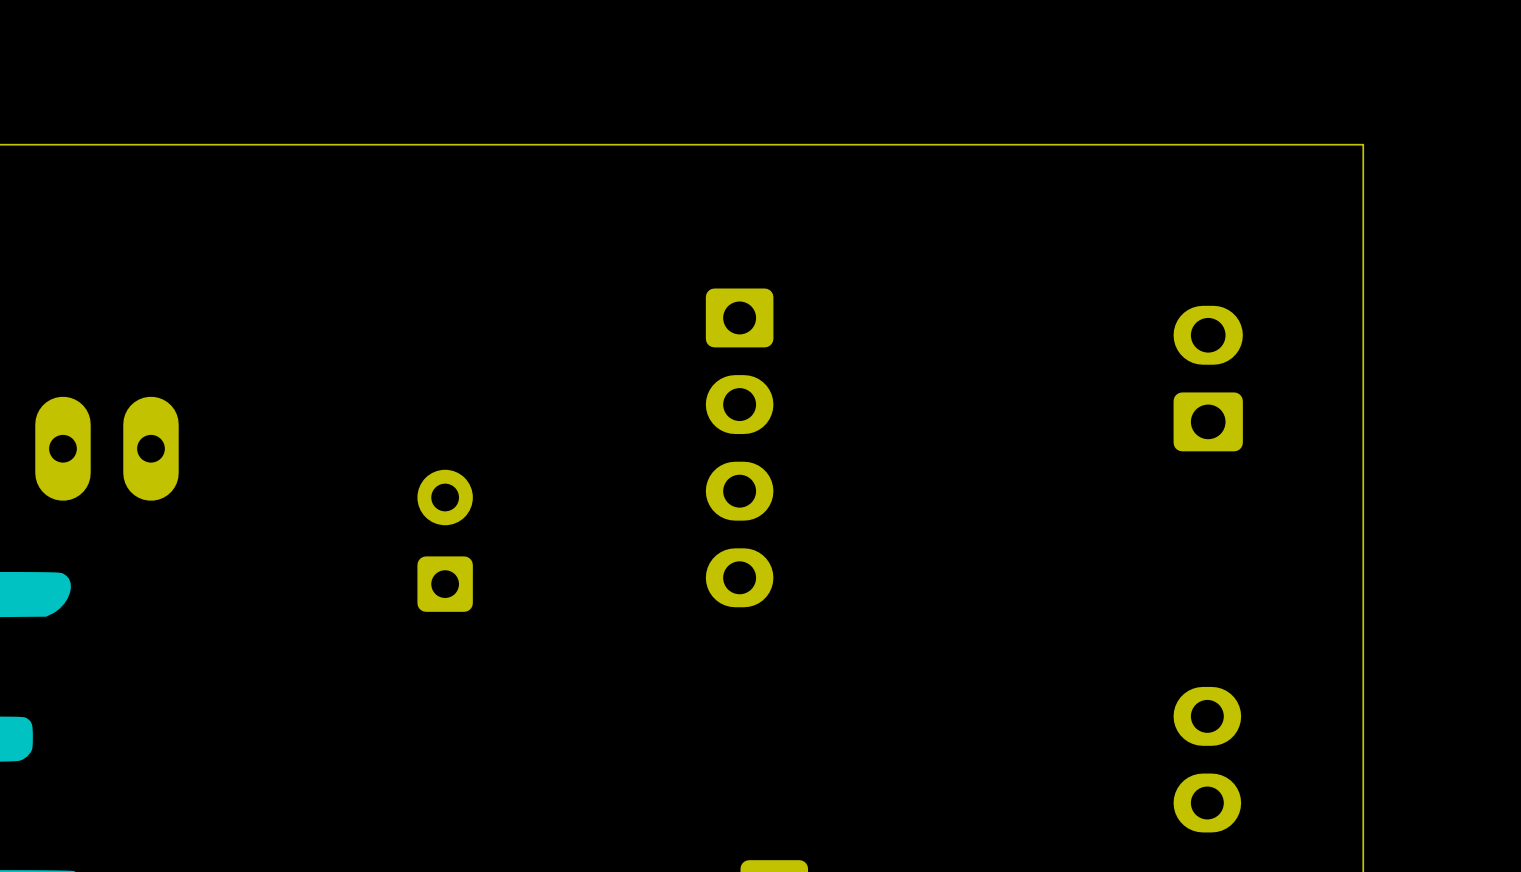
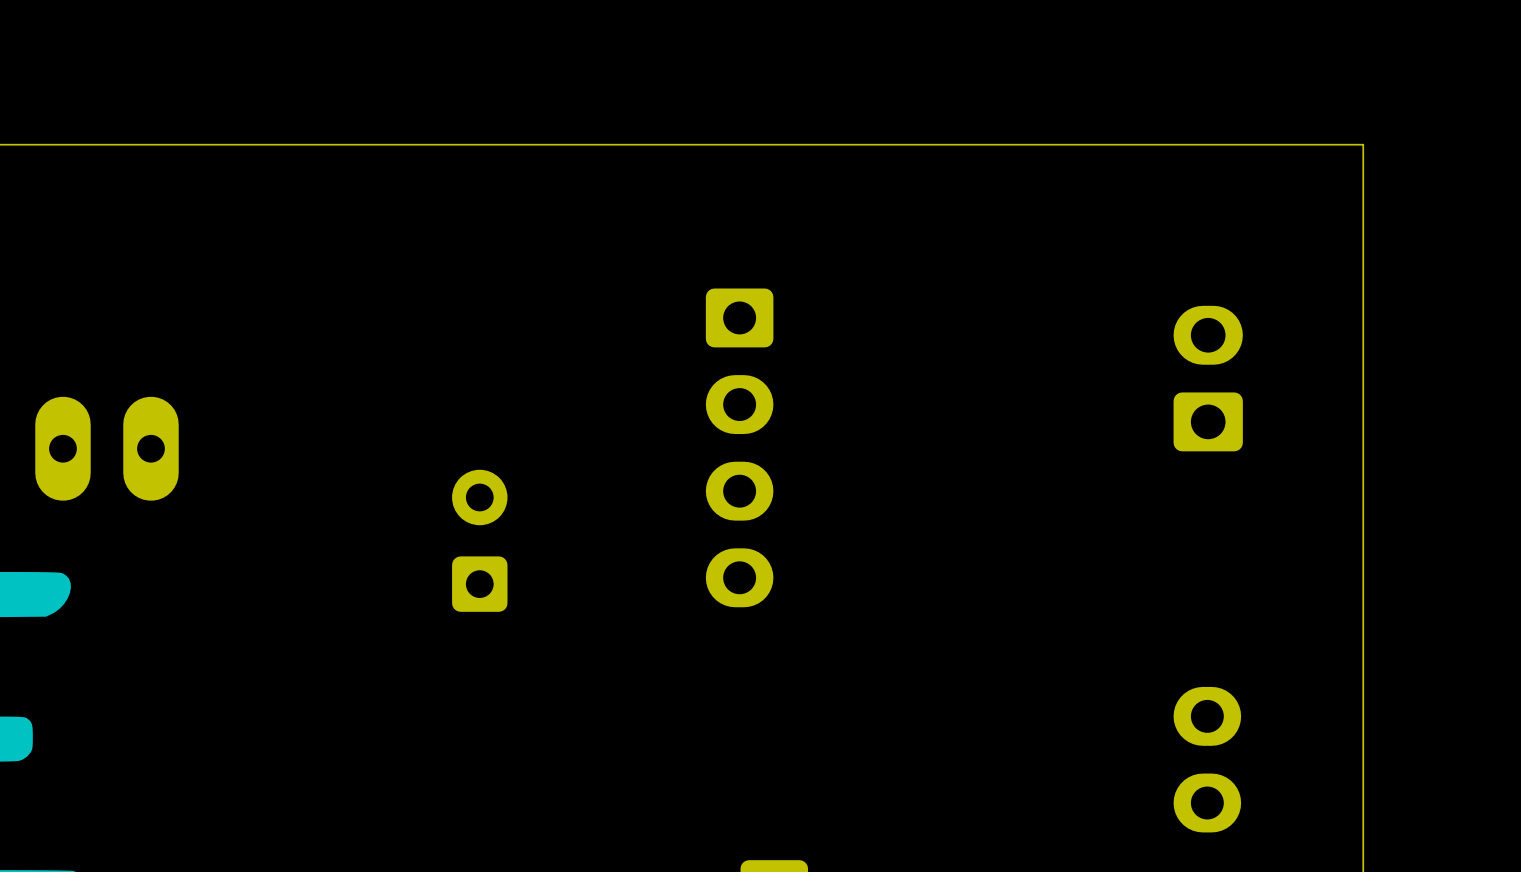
part position: (445, 540) -> (479, 540)

